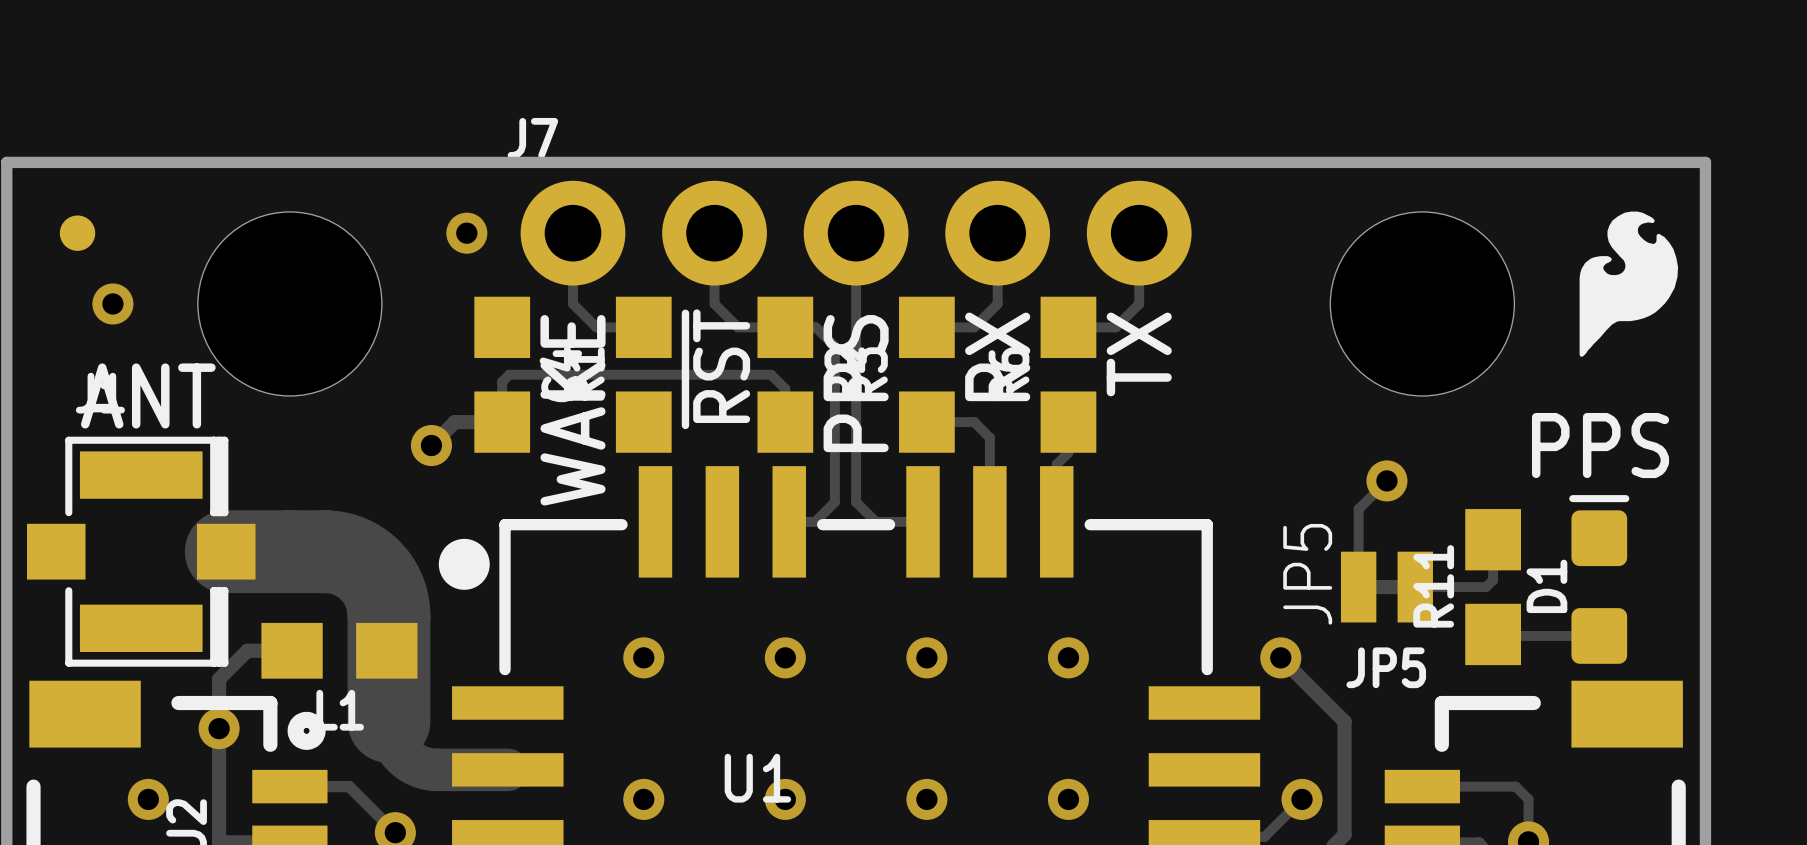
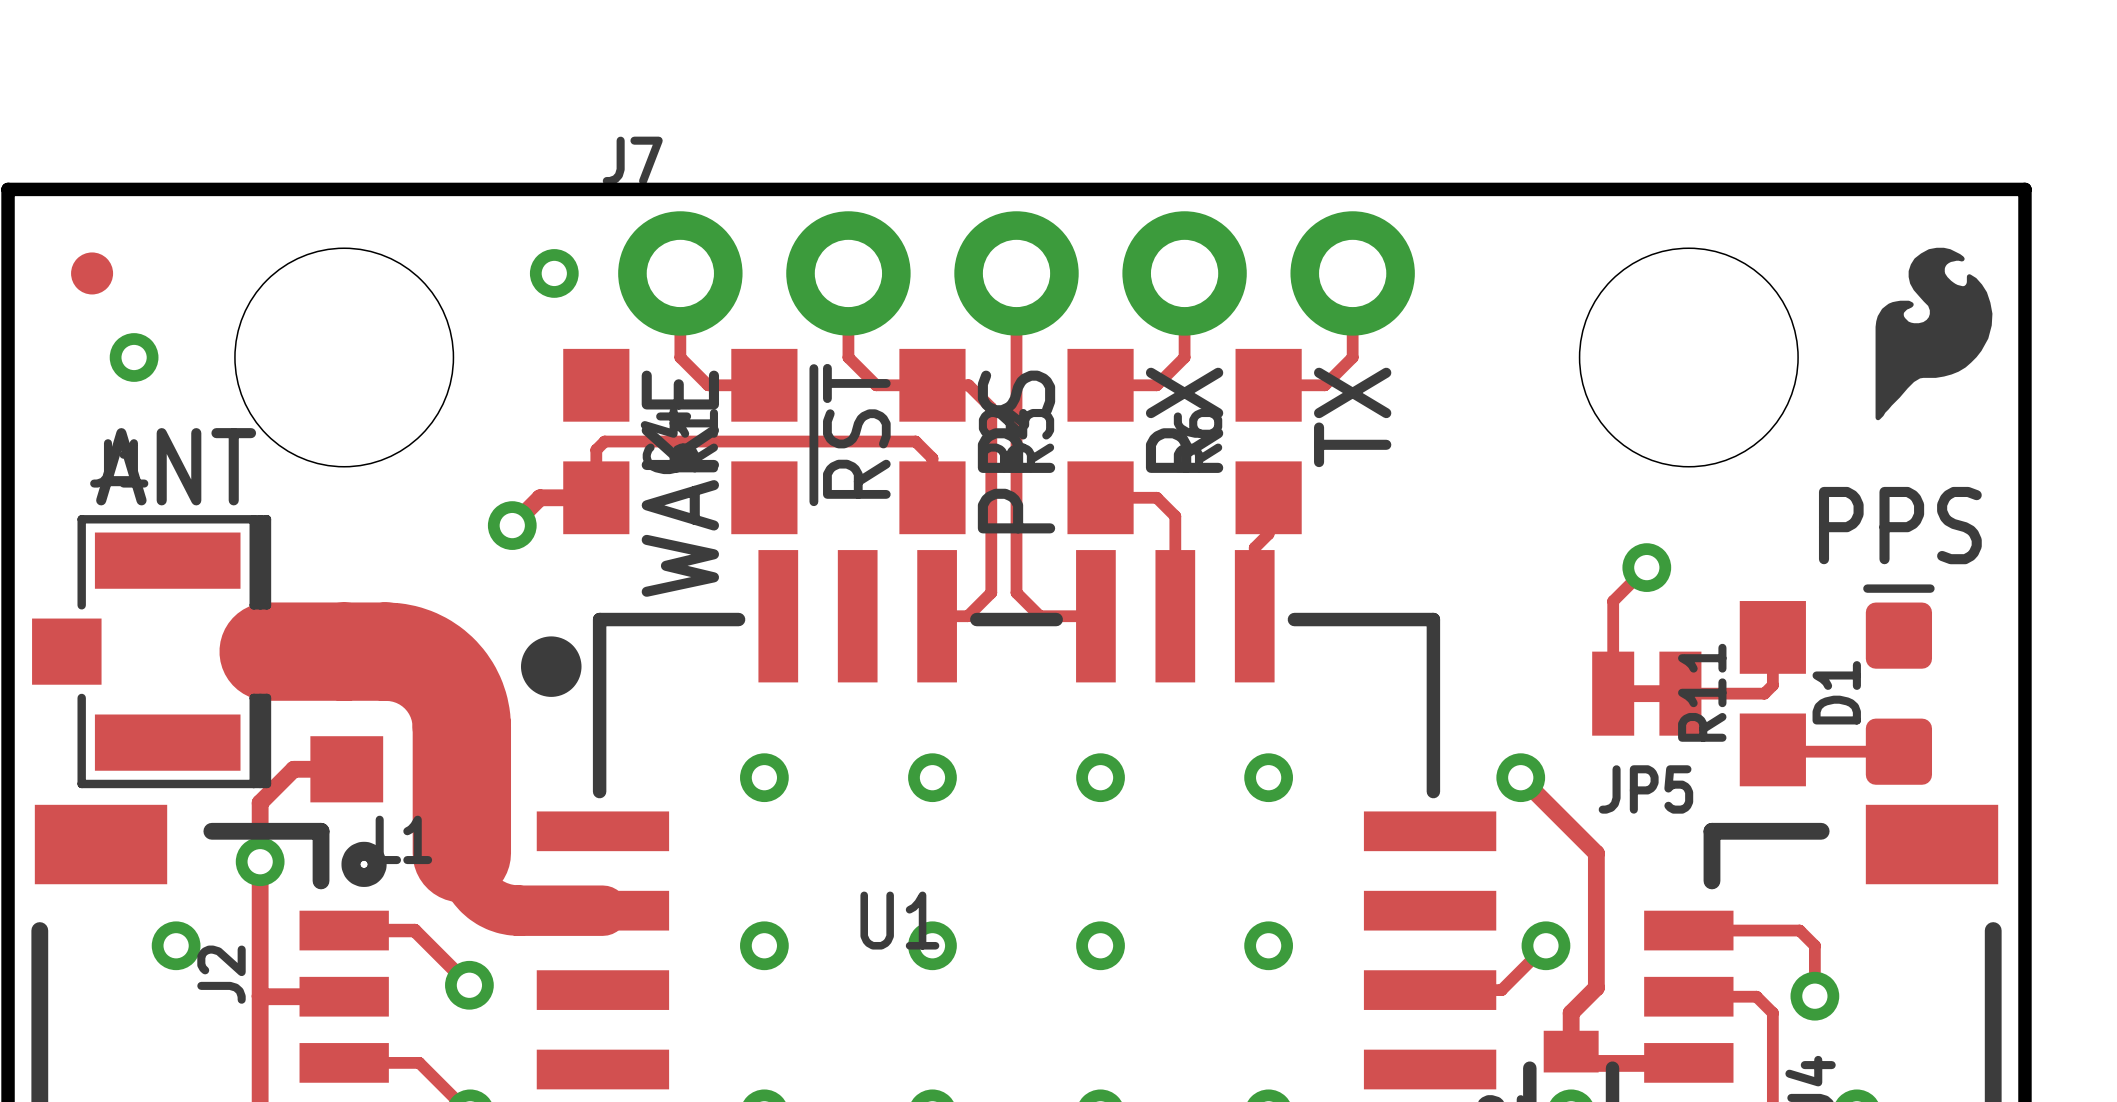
text: JP5 (1307, 574) -> none

